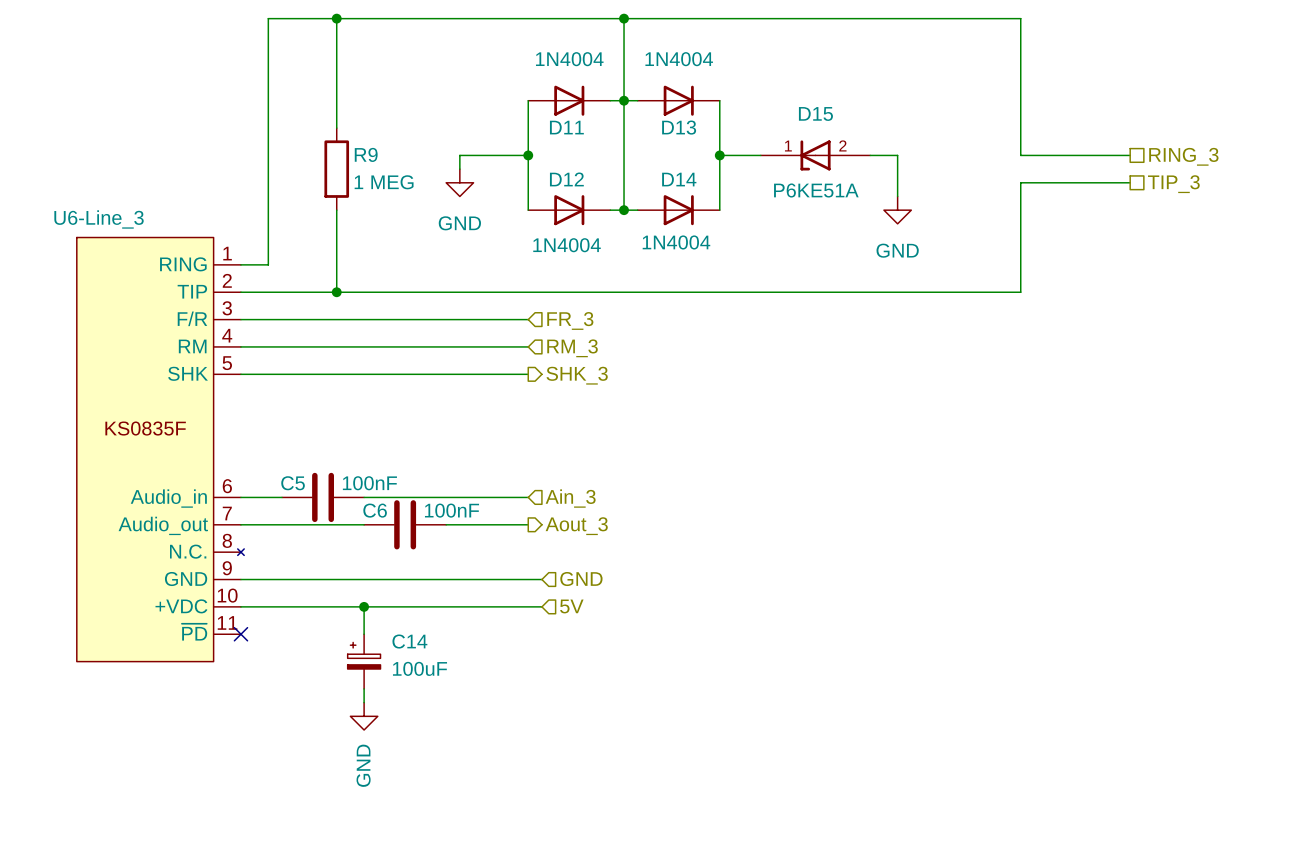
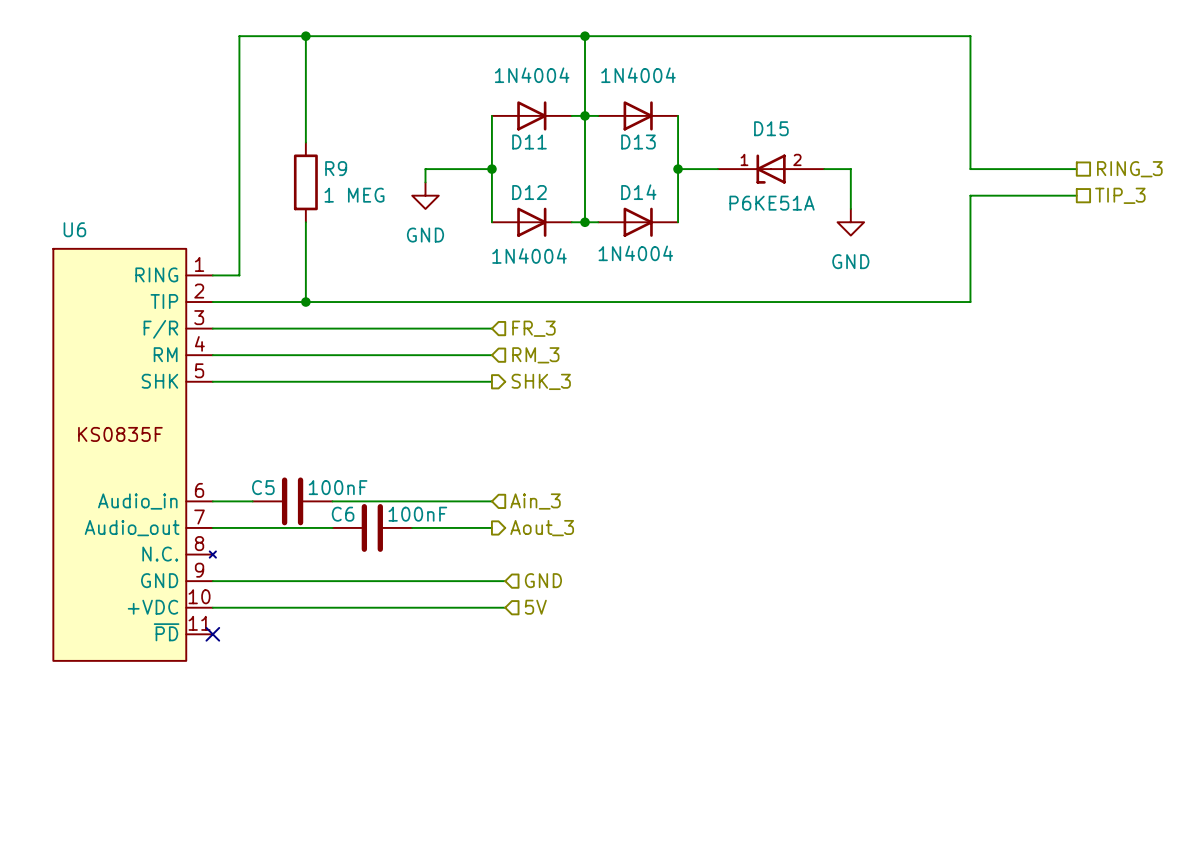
U6-Line_3 name: U6-Line_3 (99, 219) -> U6 (74, 229)
wire: (364, 606) (364, 634) -> none
junction: (364, 606) -> none
C14: 100uF (364, 661) -> none
wire: (364, 688) (364, 702) -> none
power symbol: GND (364, 716) -> none

